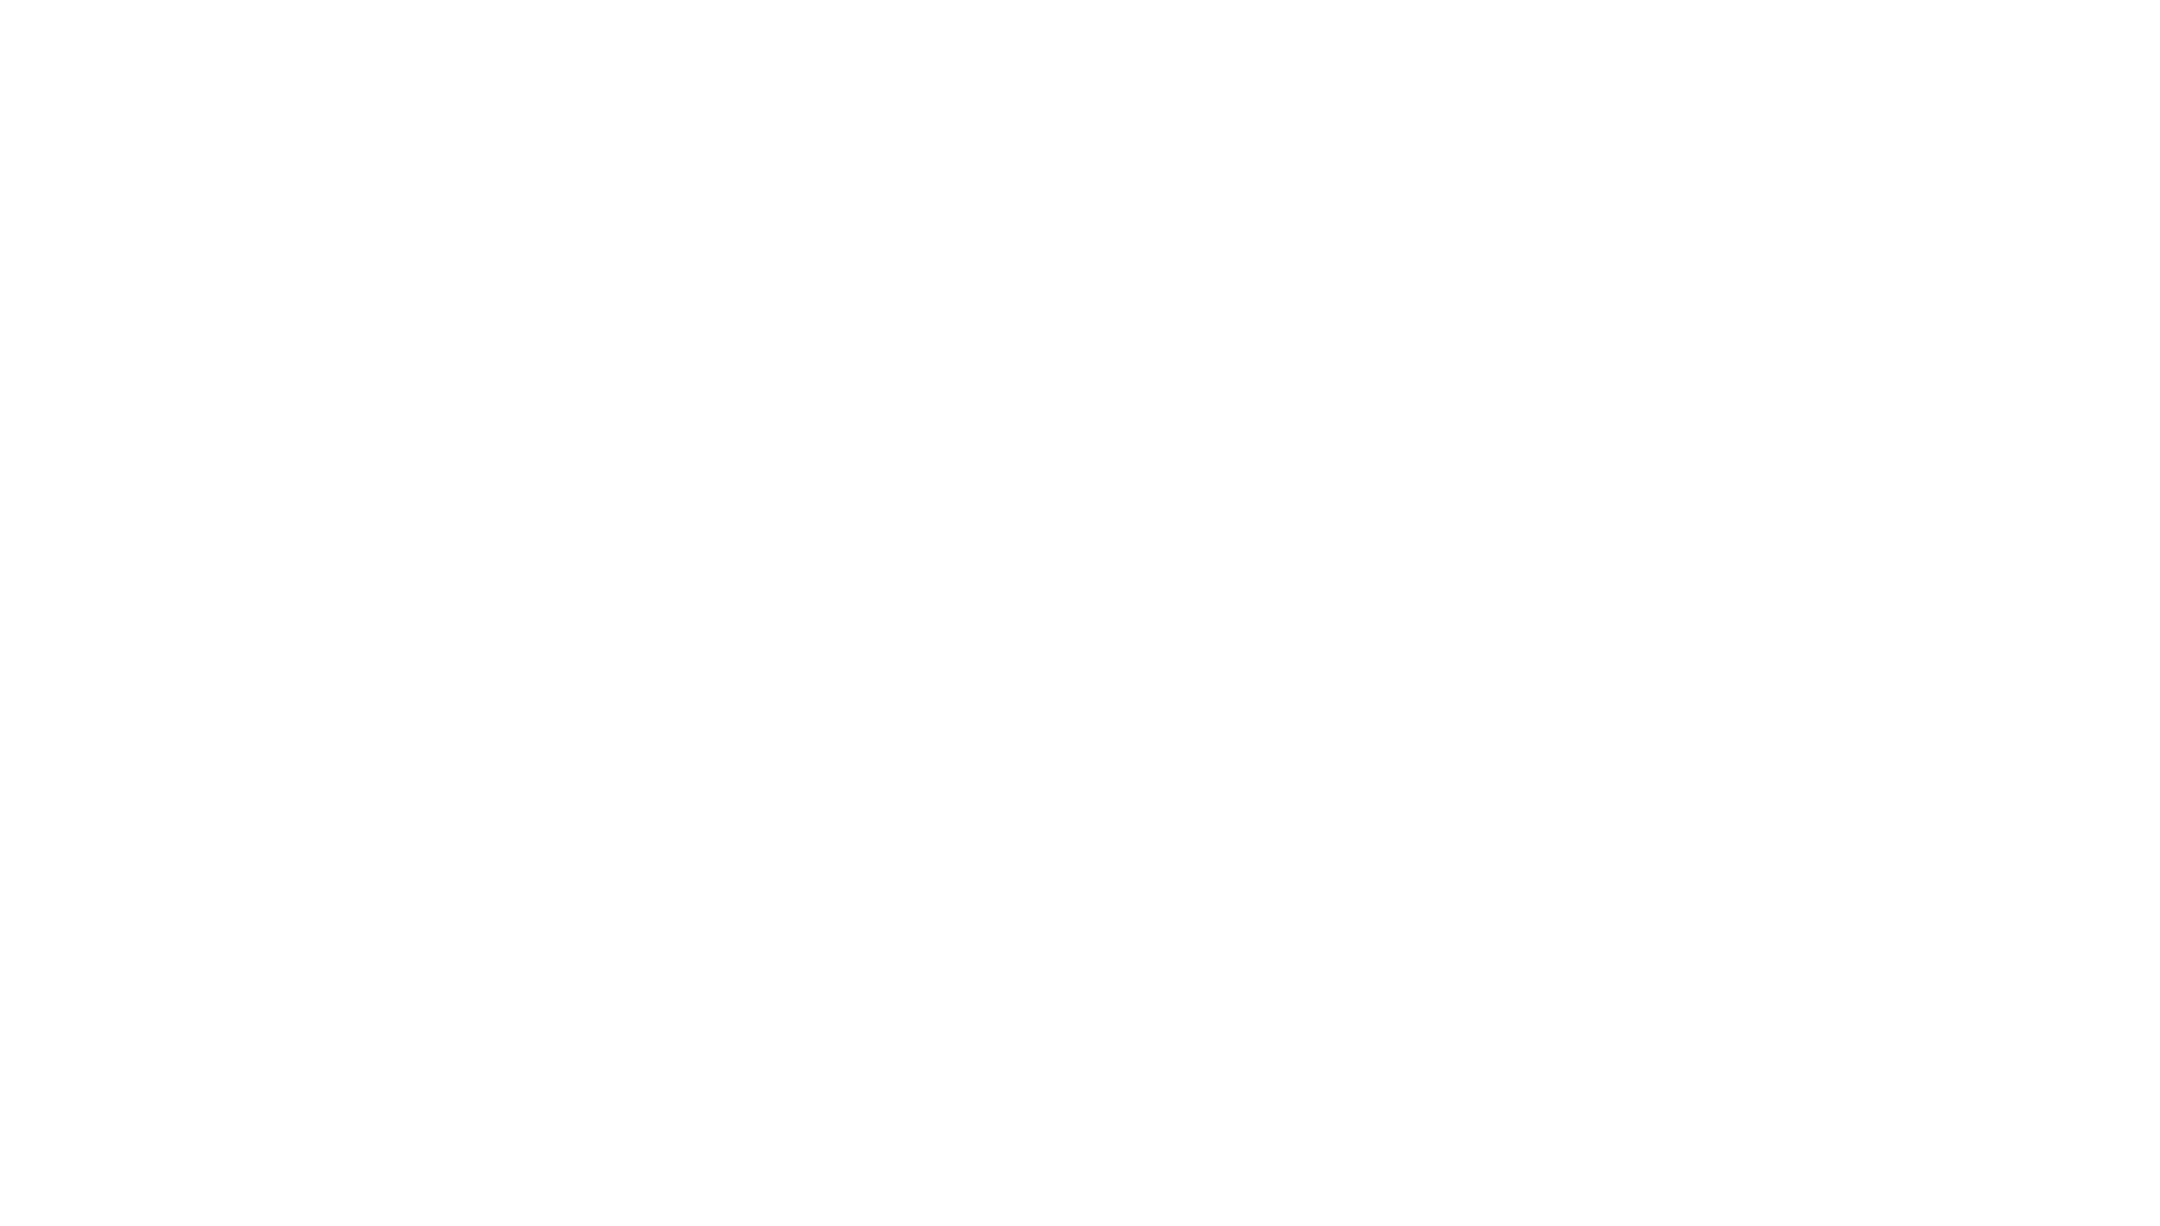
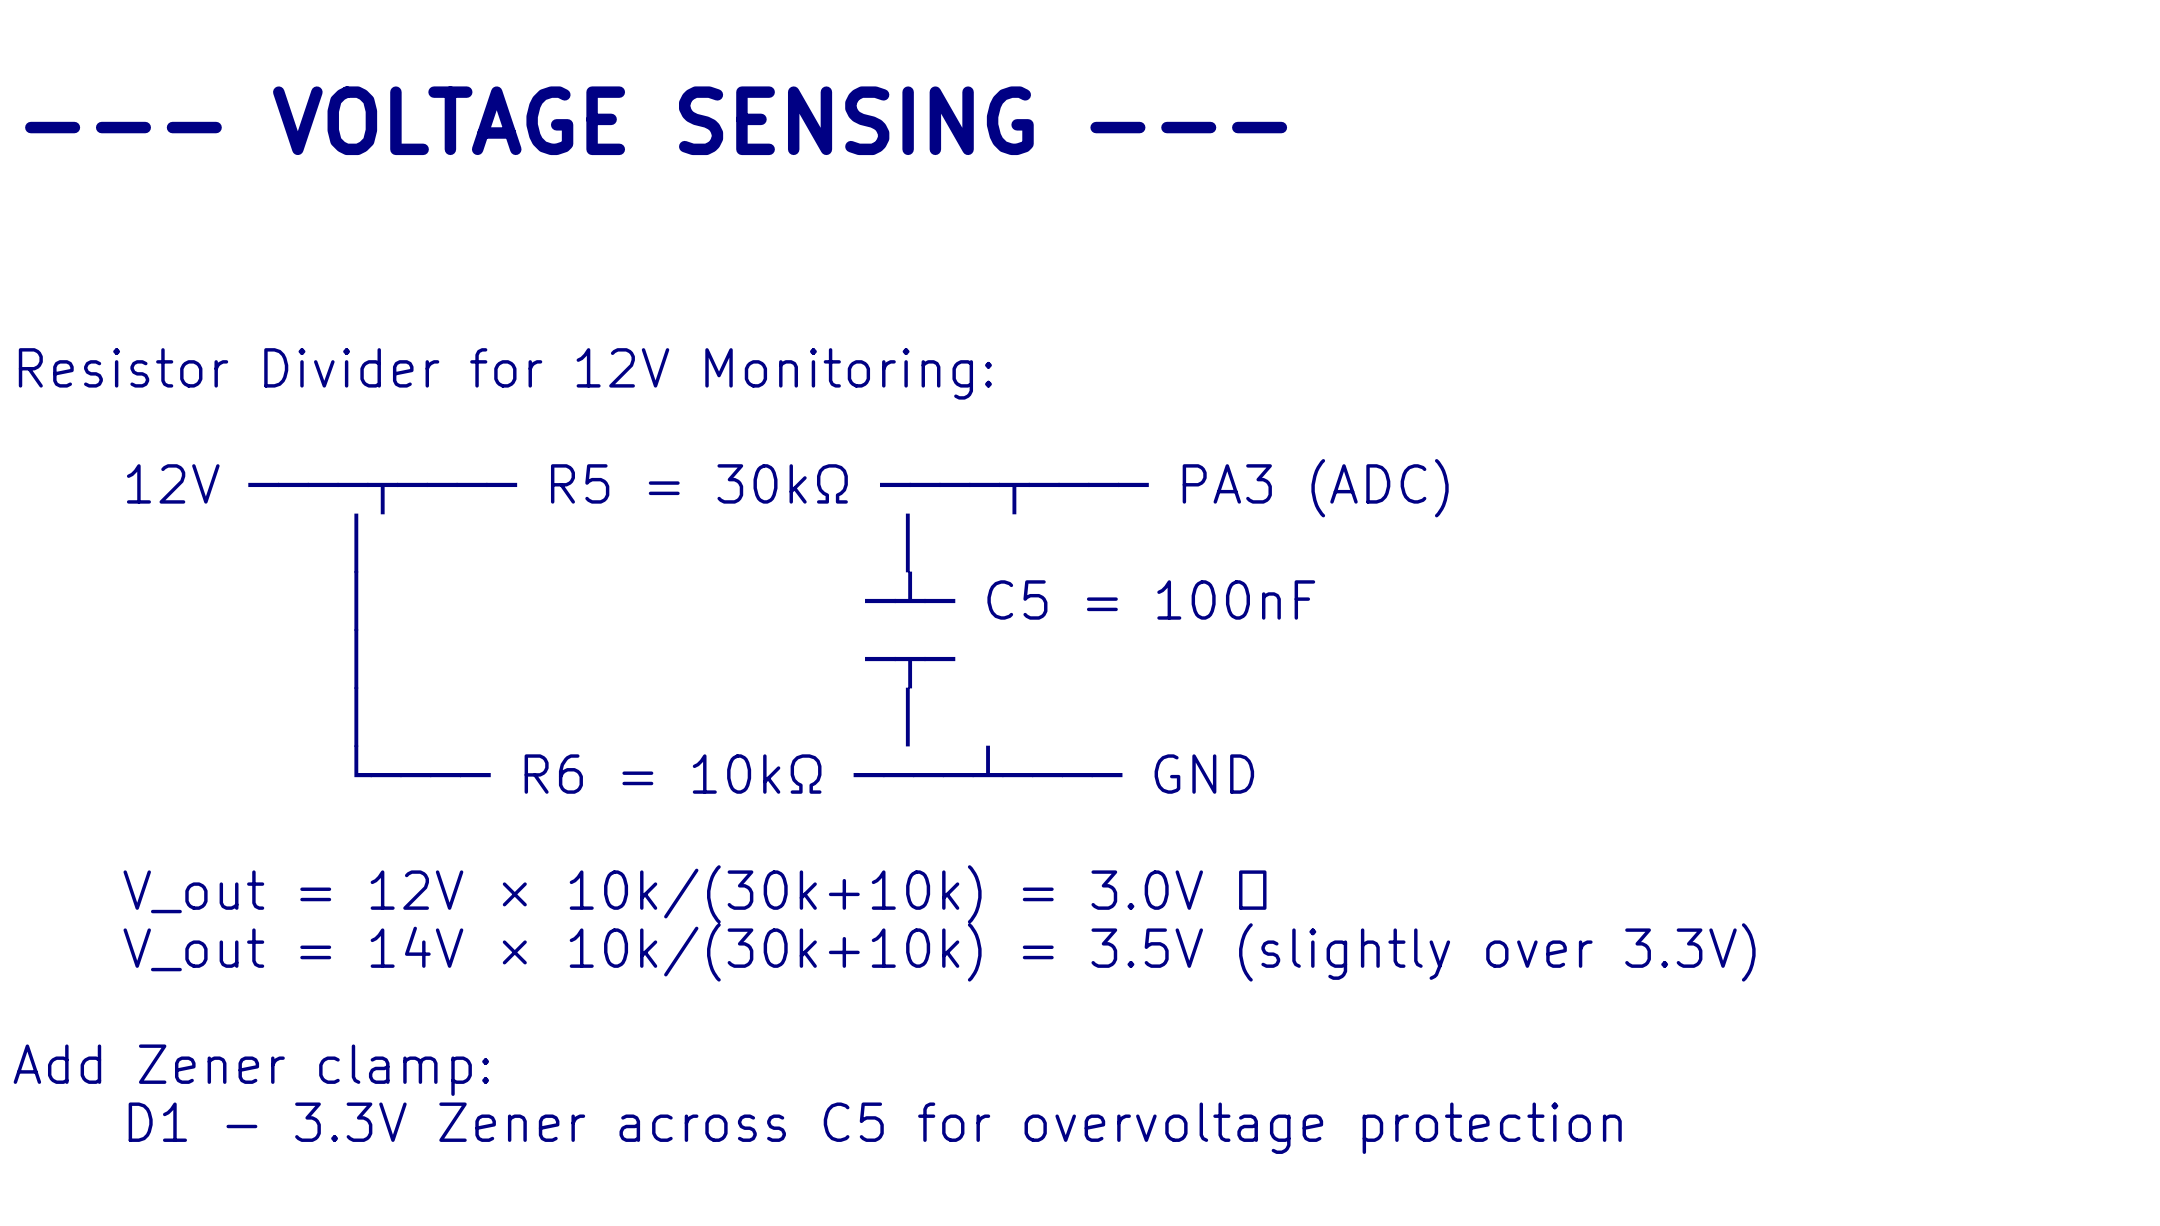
text: none -> --- VOLTAGE SENSING --- (656, 120)
text: none -> Resistor Divider for 12V Monitoring: (505, 373)
text: none -> 12V ────┬──── R5 = 30kΩ ────┬──── PA3 (ADC) (787, 488)
text: none -> │ │ (632, 542)
text: none -> │ ─┴─ C5 = 100nF (833, 600)
text: none -> │ ─┬─ (654, 659)
text: none -> │ │ (632, 717)
text: none -> └──── R6 = 10kΩ ────┴──── GND (803, 768)
text: none -> V_out = 12V × 10k/(30k+10k) = 3.0V ✓ (695, 894)
text: none -> V_out = 14V × 10k/(30k+10k) = 3.5V (slightly over 3.3V) (939, 952)
text: none -> Add Zener clamp: (251, 1070)
text: none -> D1 - 3.3V Zener across C5 for overvoltage protection (875, 1128)

